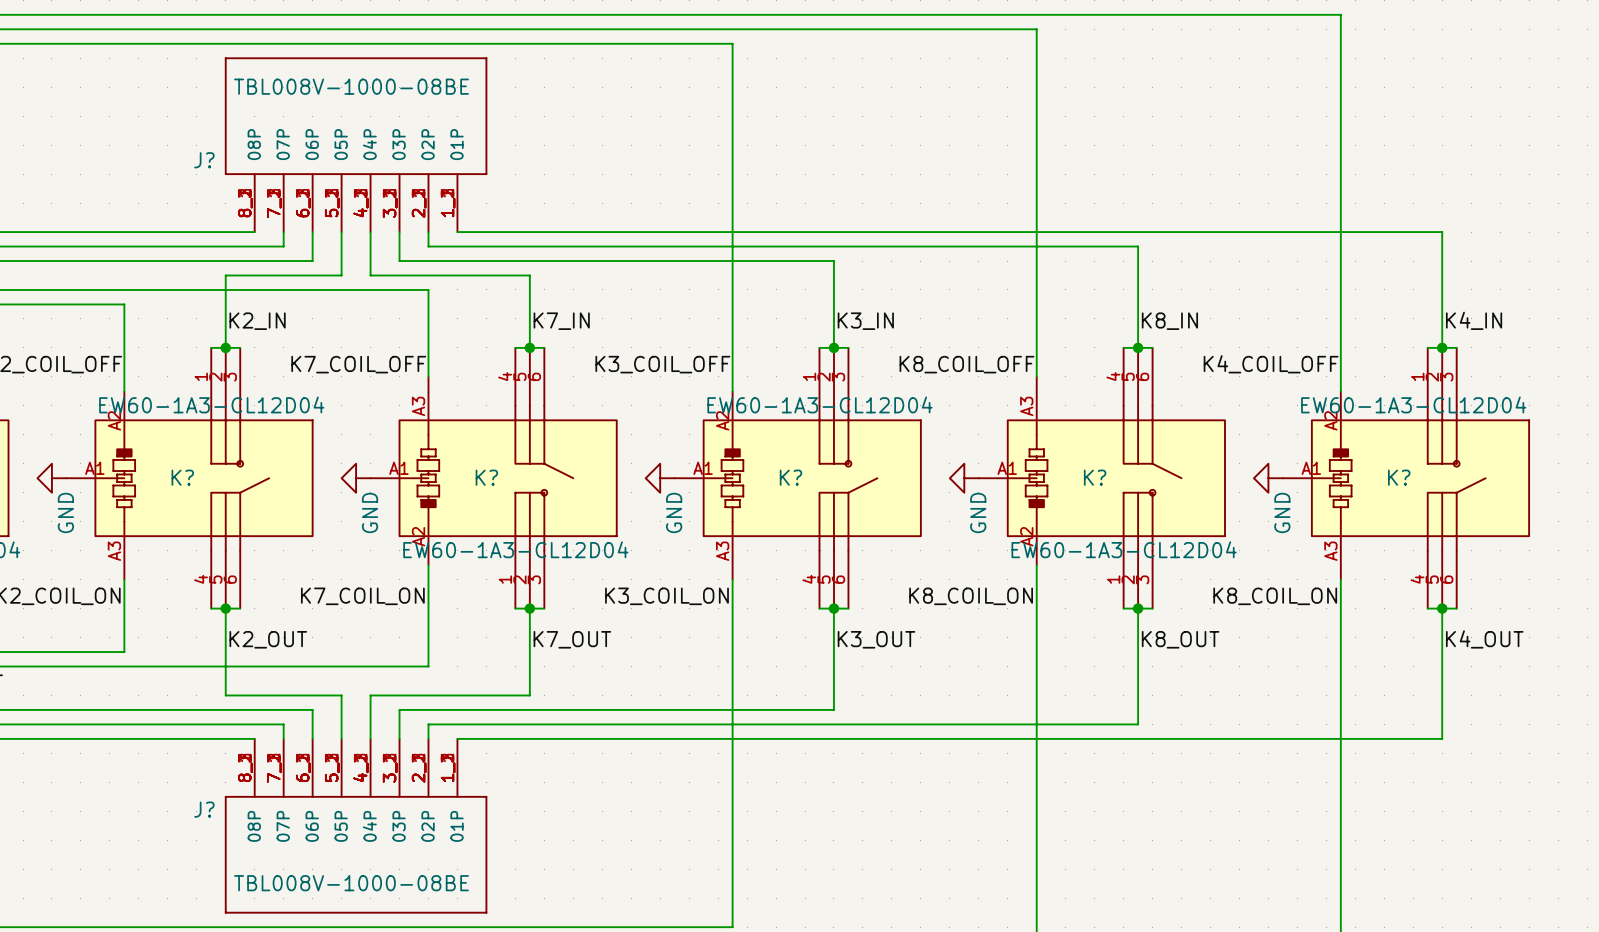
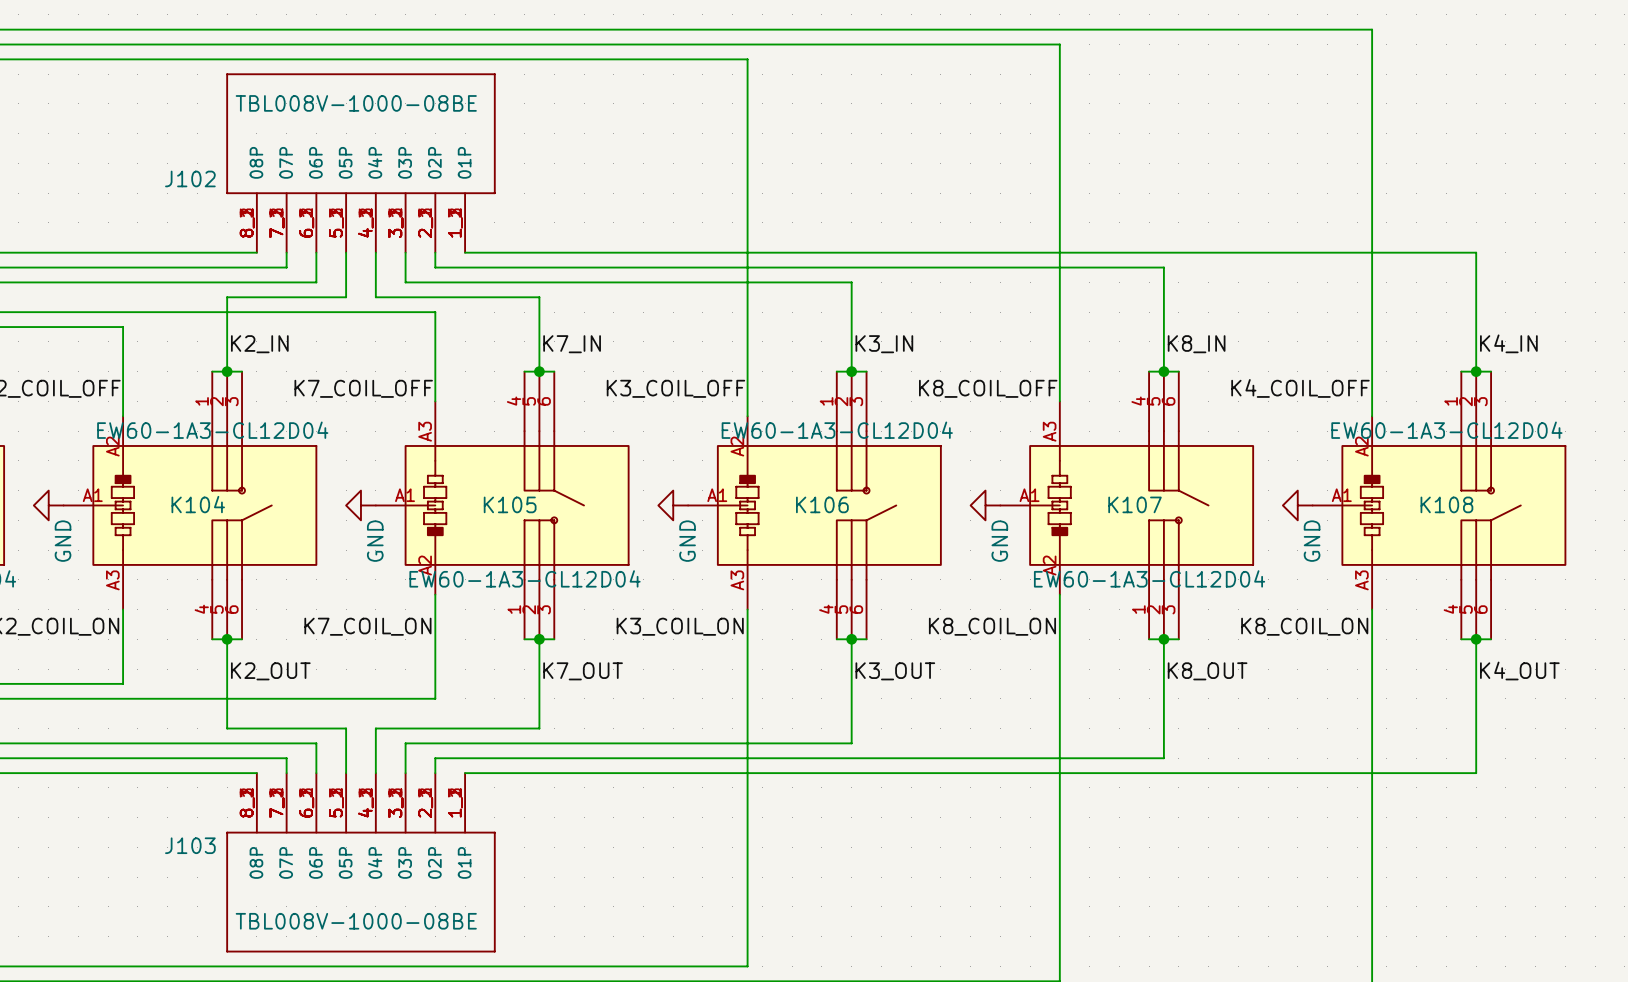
J? name: J? (204, 160) -> J102 (190, 178)
K? name: K? (182, 477) -> K104 (198, 504)
K? name: K? (486, 477) -> K105 (510, 504)
K? name: K? (790, 477) -> K106 (822, 504)
K? name: K? (1095, 477) -> K107 (1135, 504)
K? name: K? (1399, 477) -> K108 (1446, 504)
J? name: J? (204, 809) -> J103 (190, 845)

